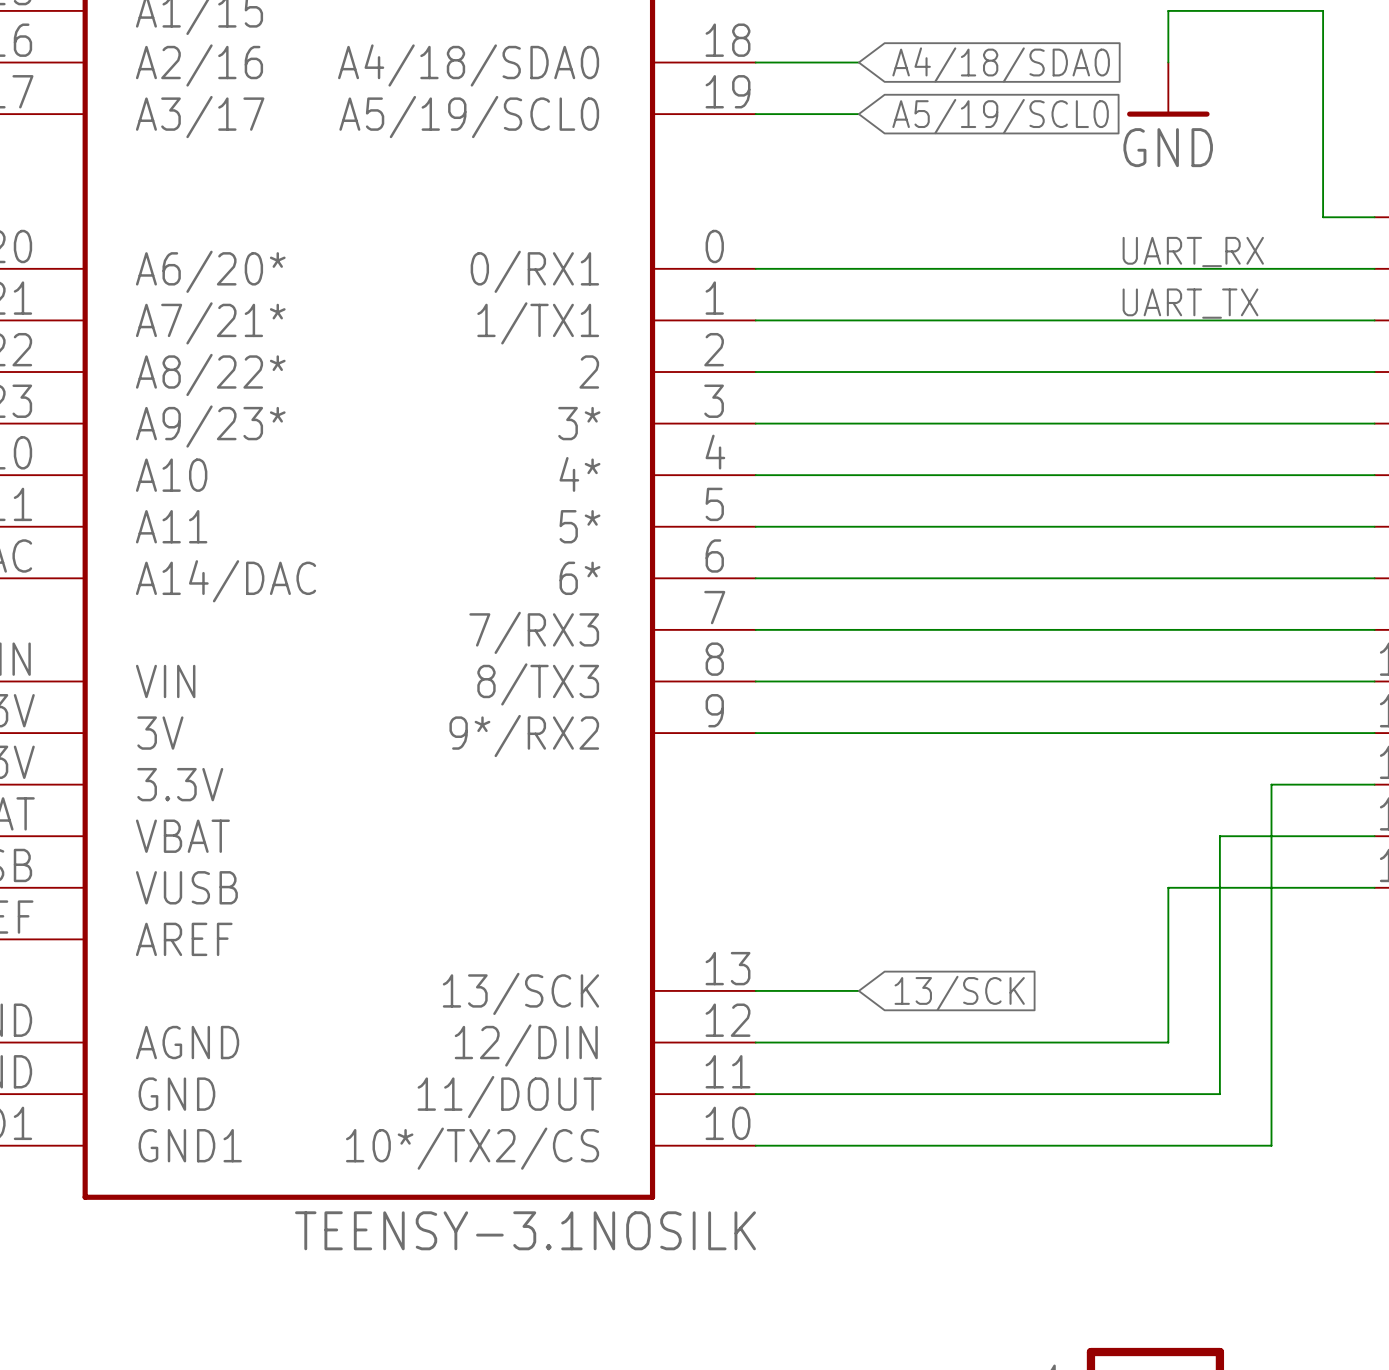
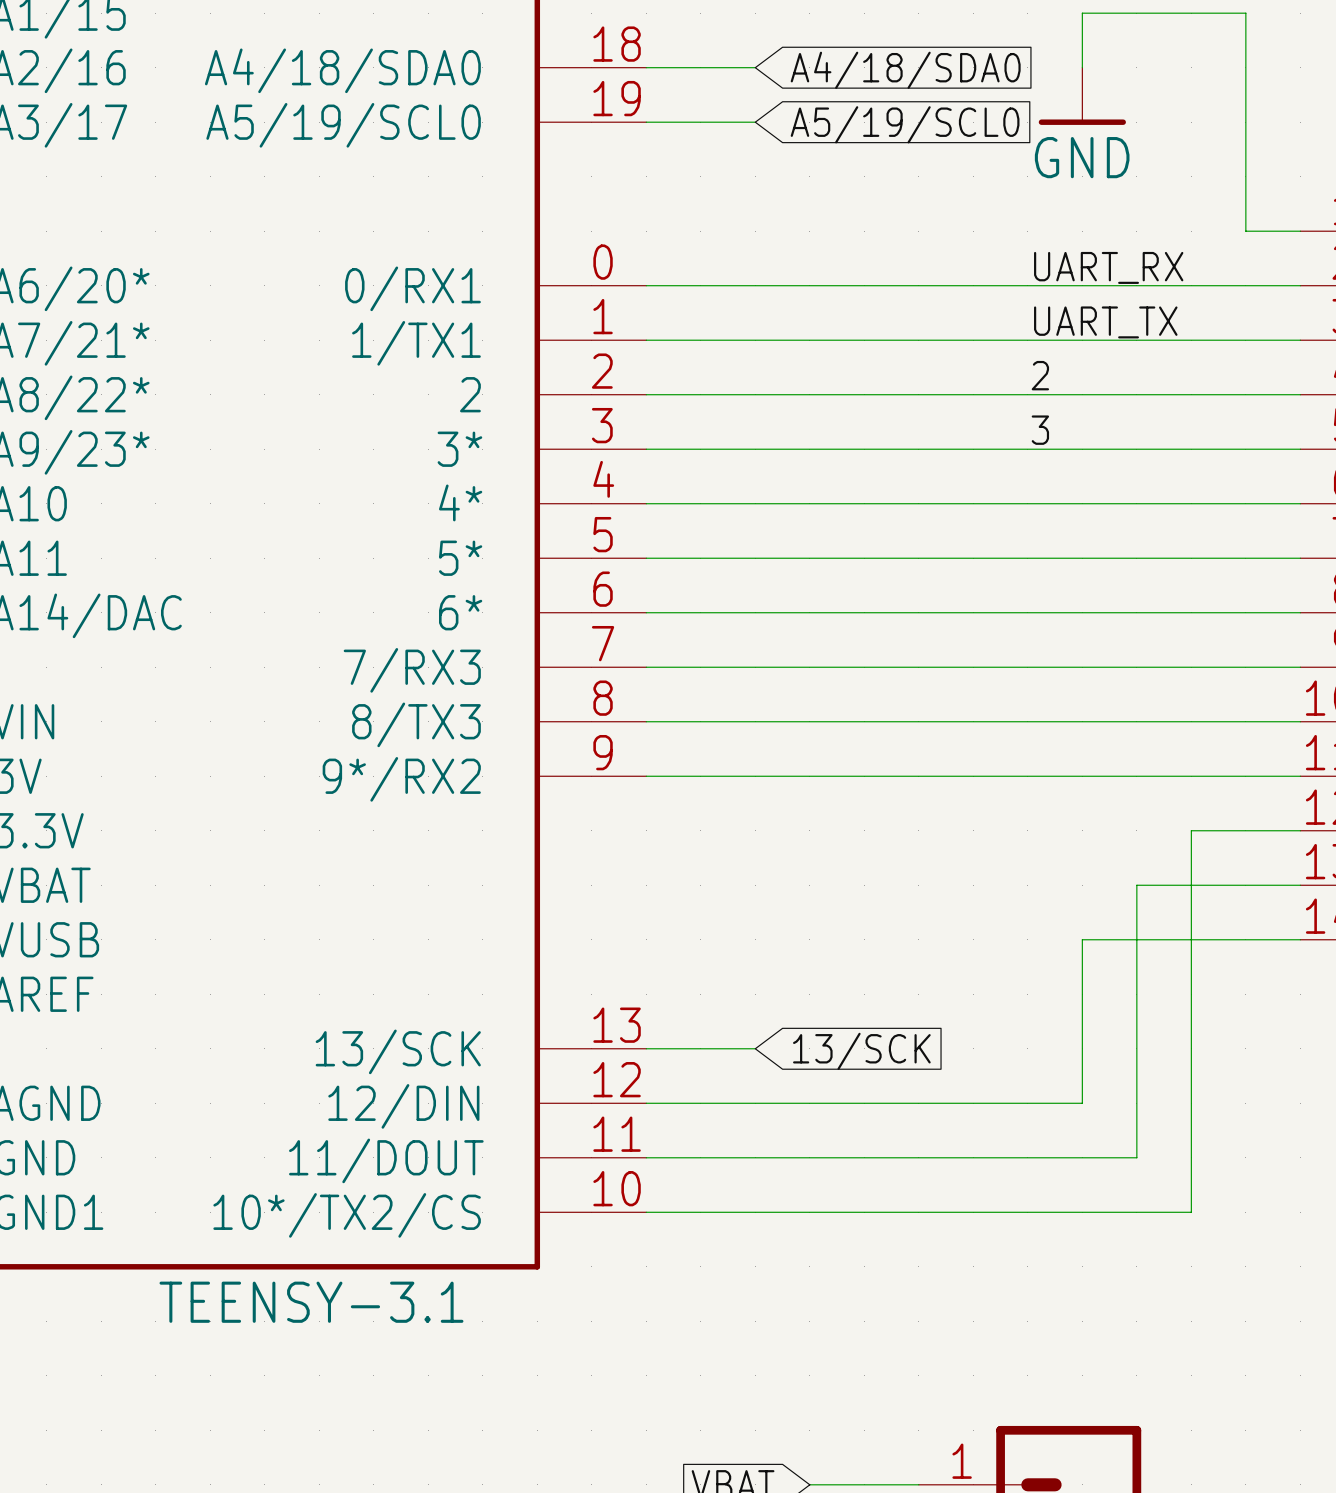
label: none -> 2 (1040, 375)
label: none -> 3 (1040, 430)
part value: TEENSY-3.1NOSILK (525, 1230) -> TEENSY-3.1 (311, 1302)

